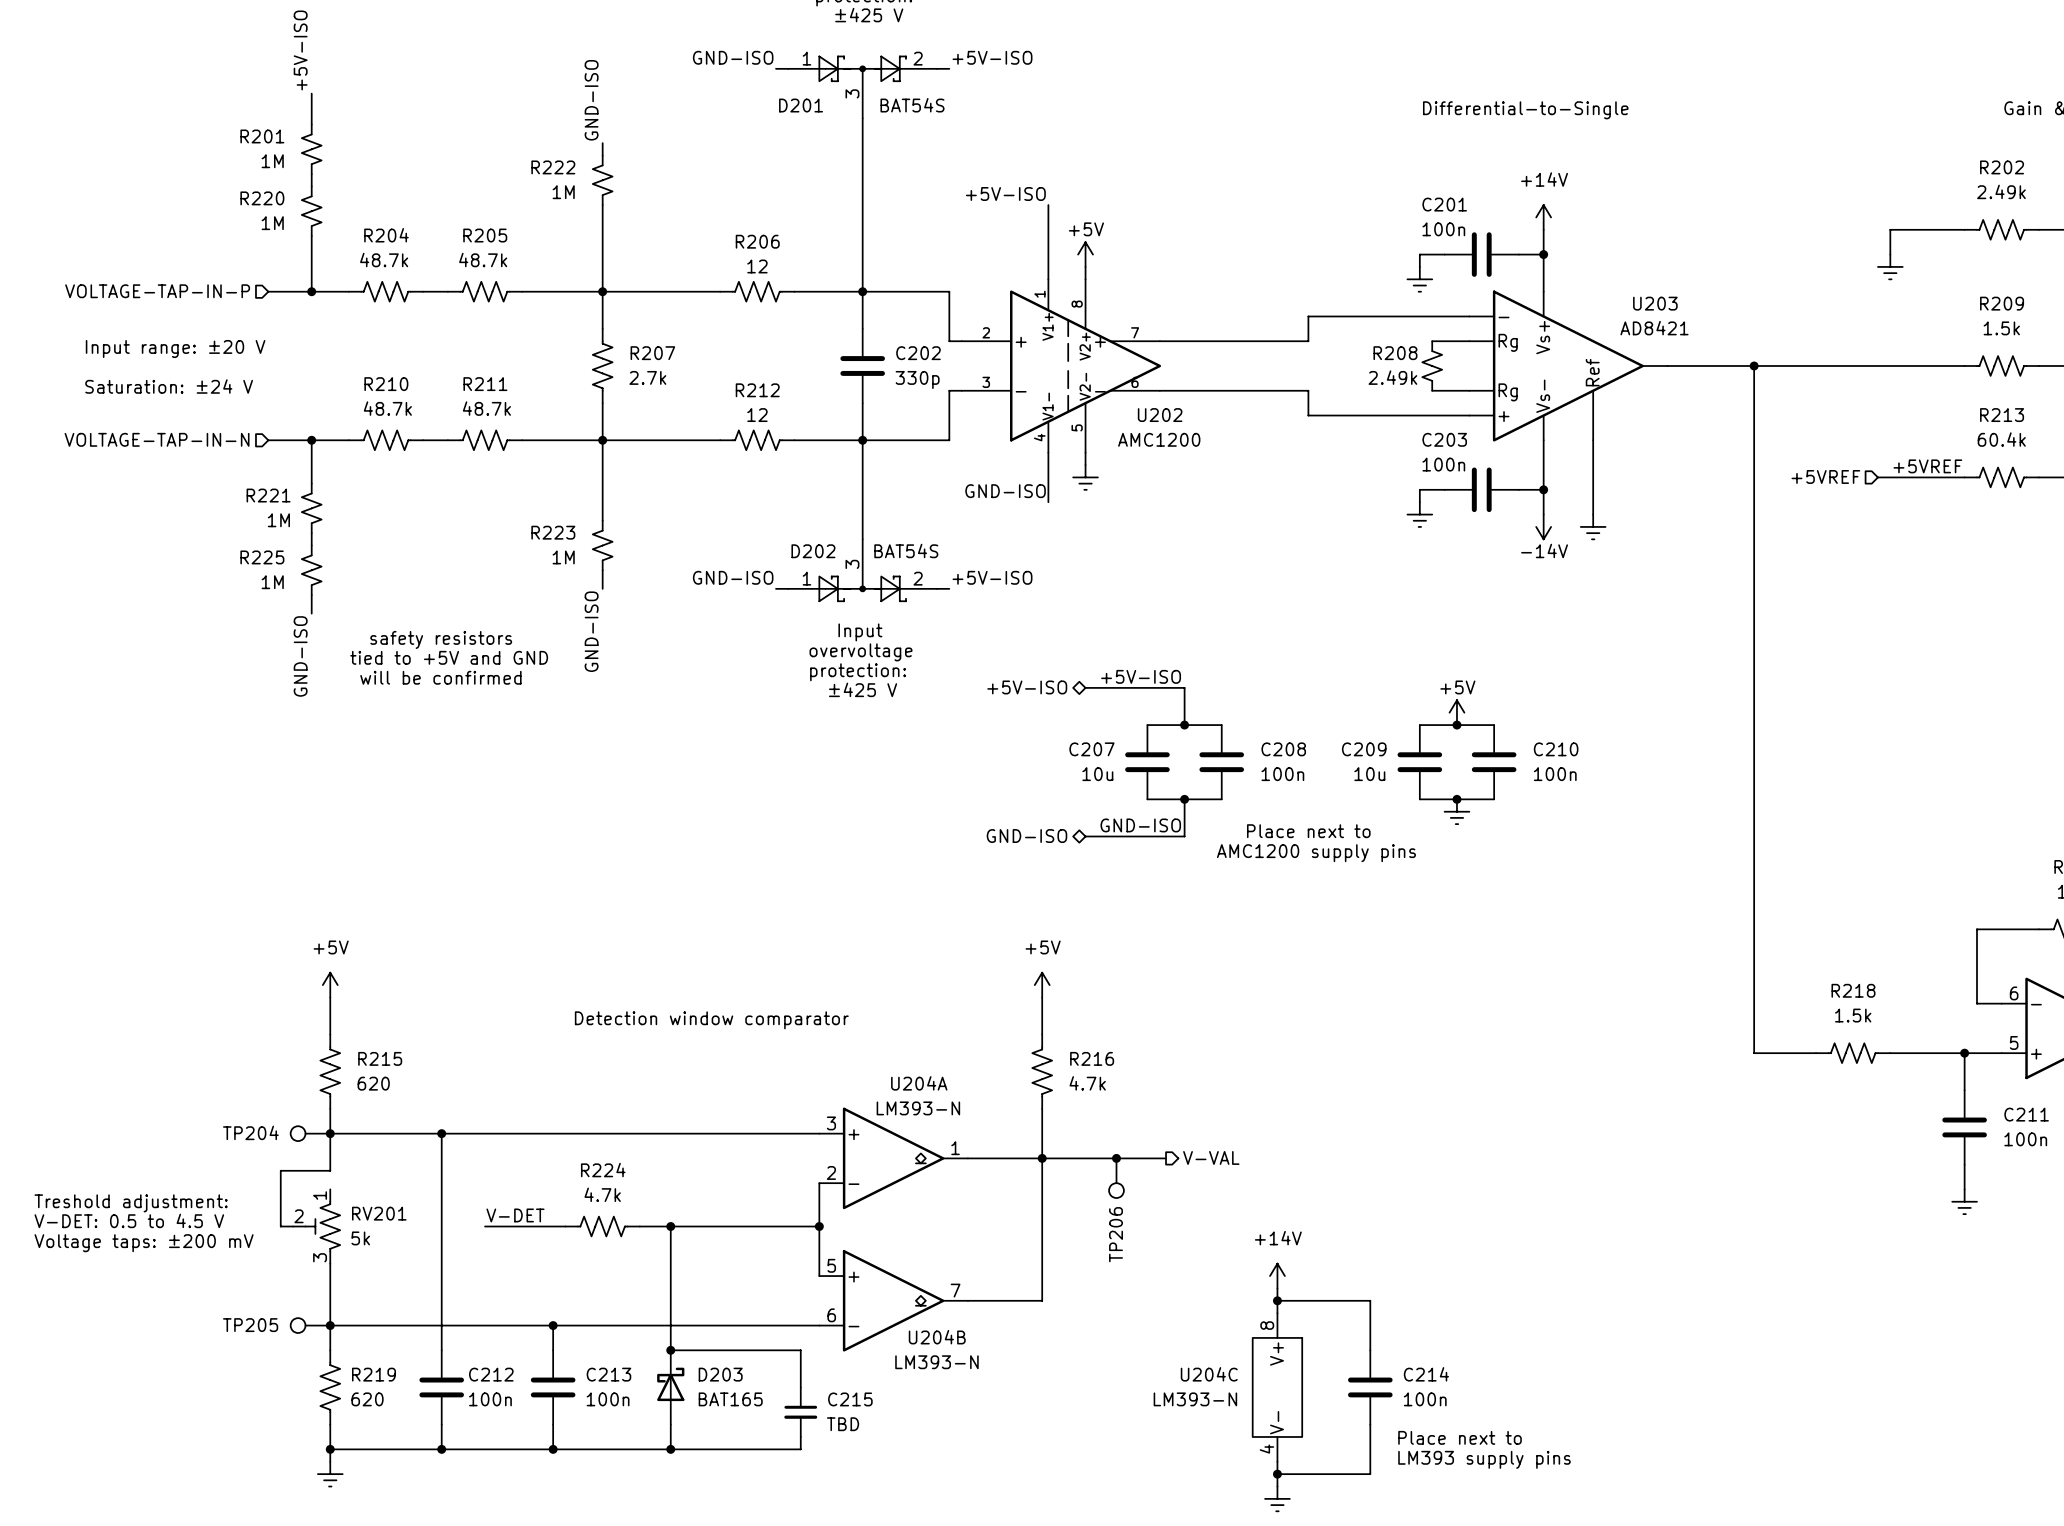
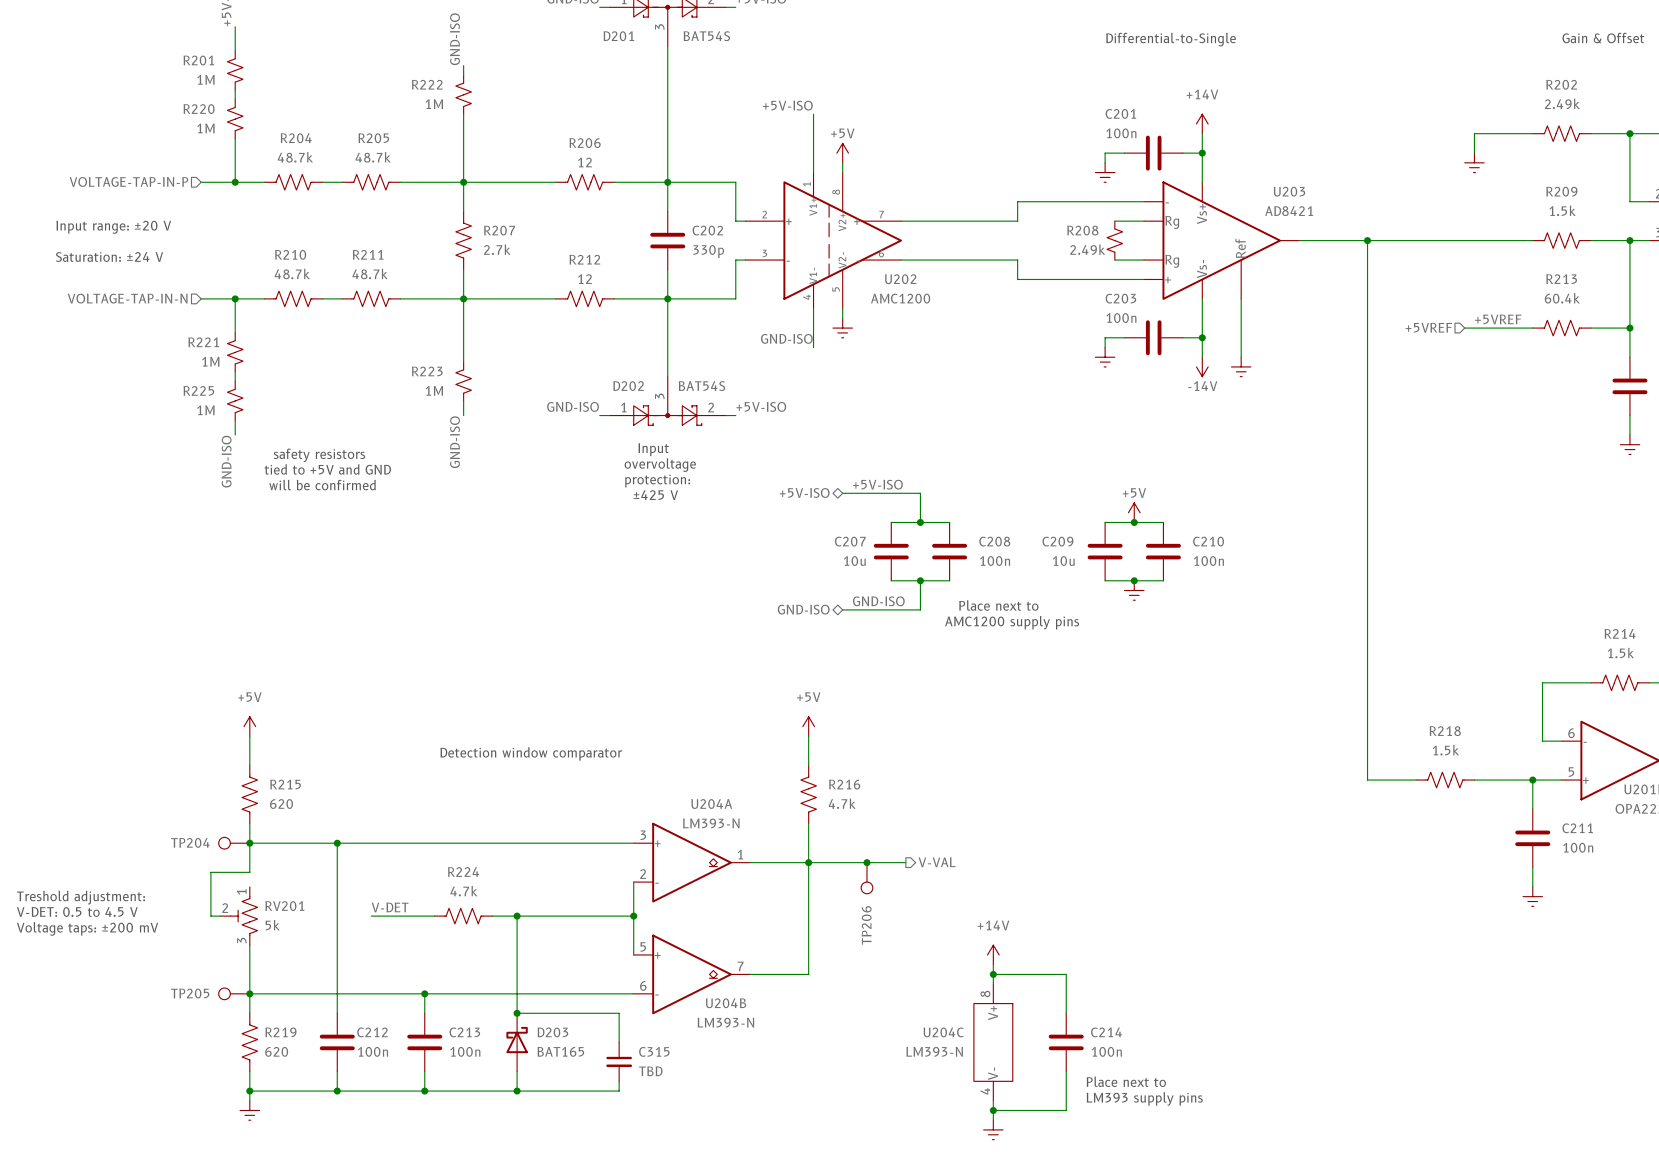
C215 name: C215 (850, 1399) -> C315 (654, 1051)

